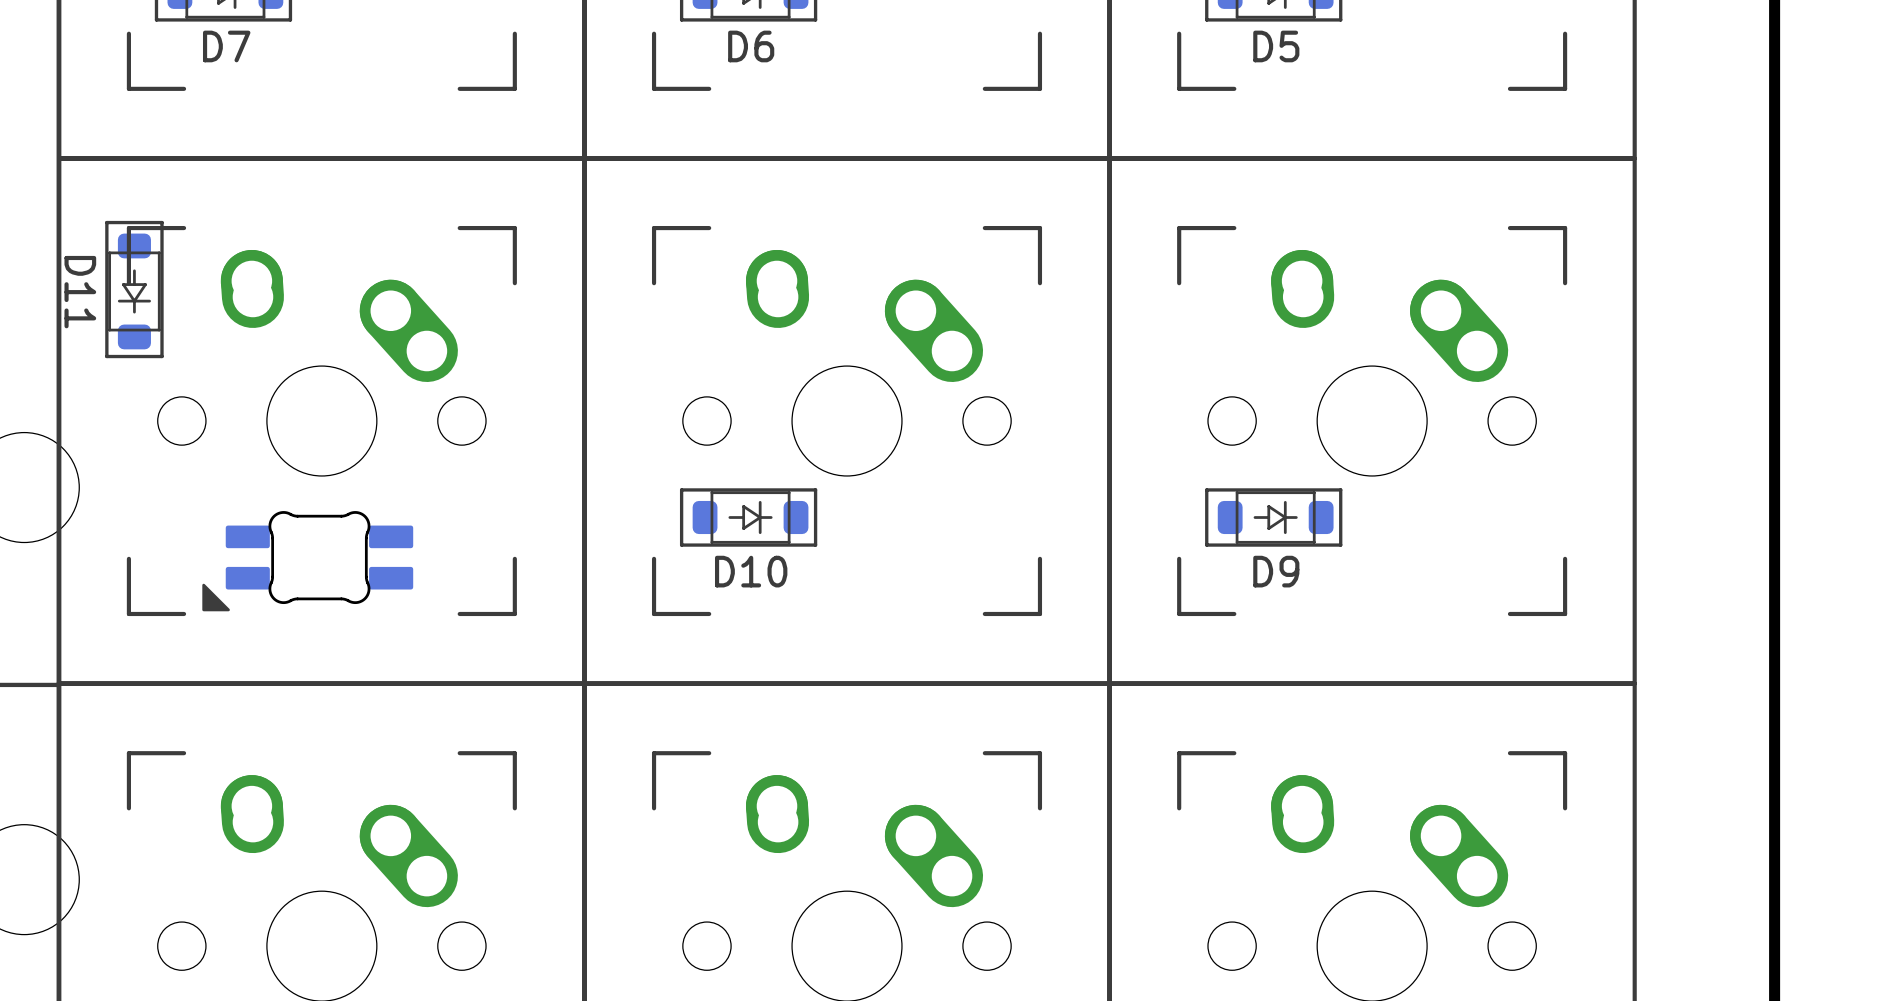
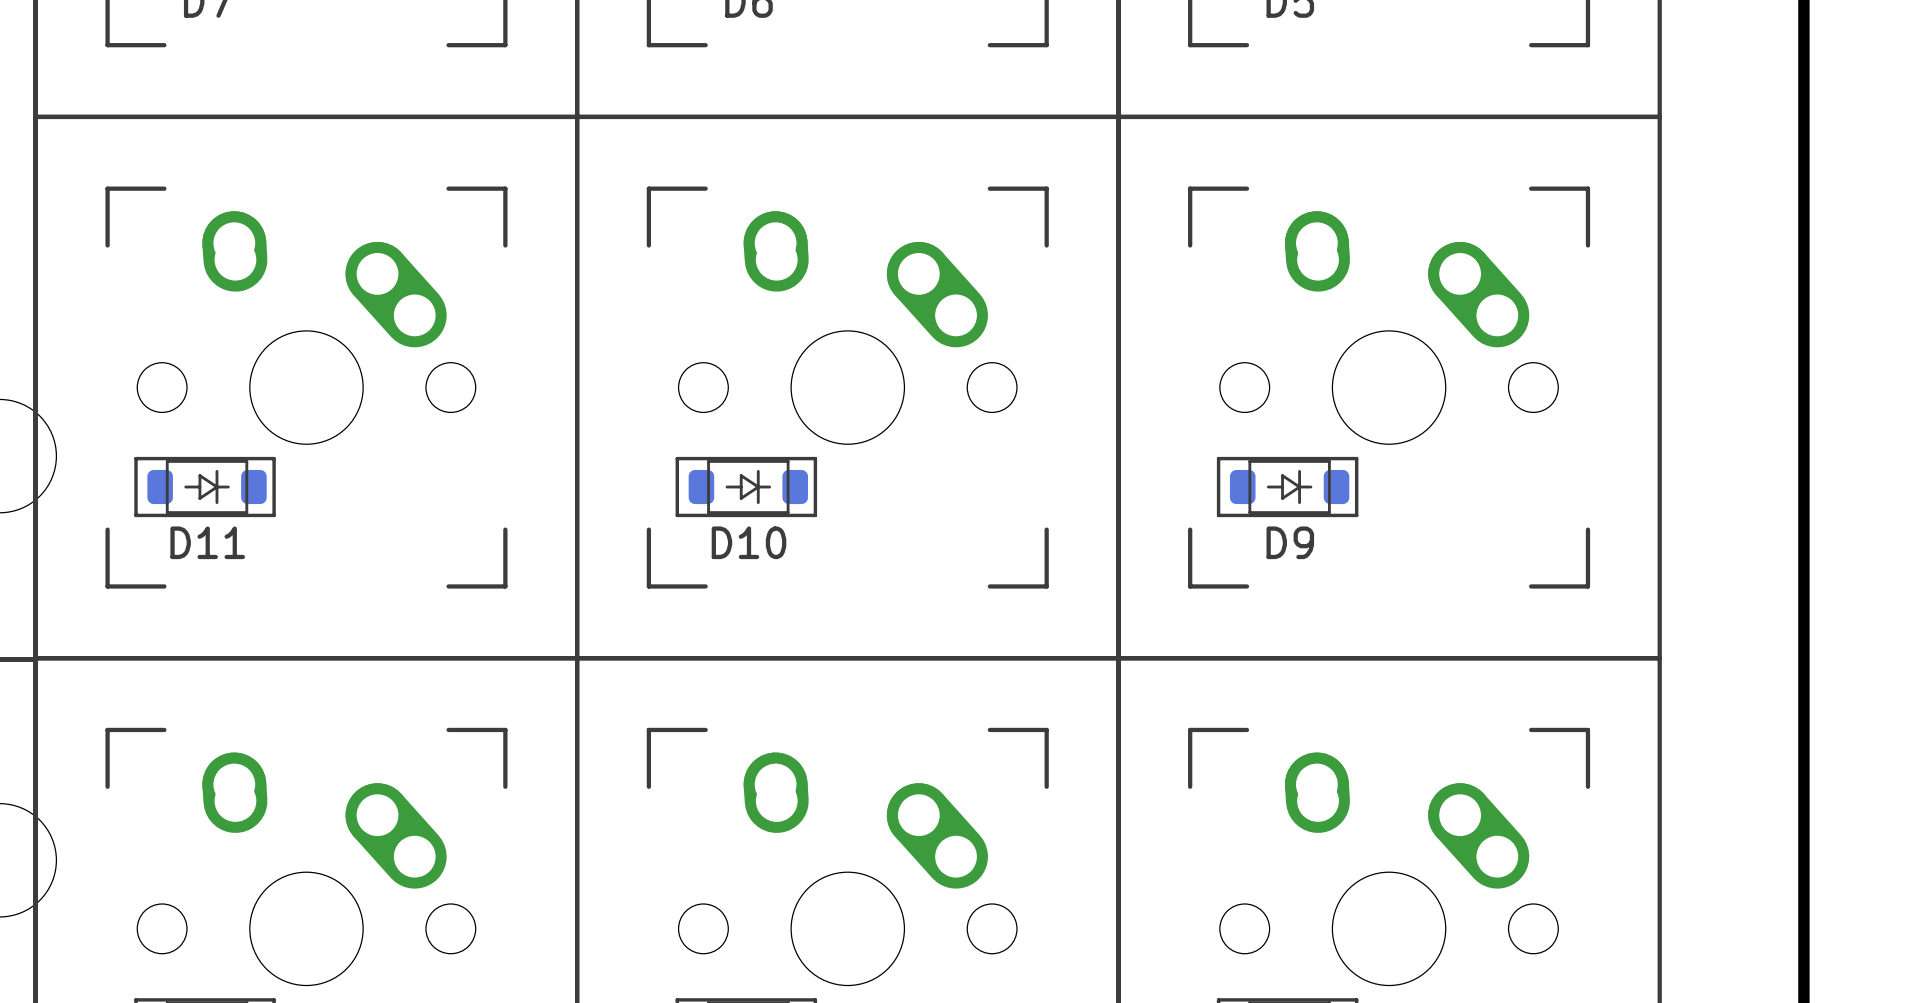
D11 rotation: 0° (134, 289) -> 90° counterclockwise (205, 487)
D11 position: (134, 289) -> (205, 487)
part: (307, 561) -> none

